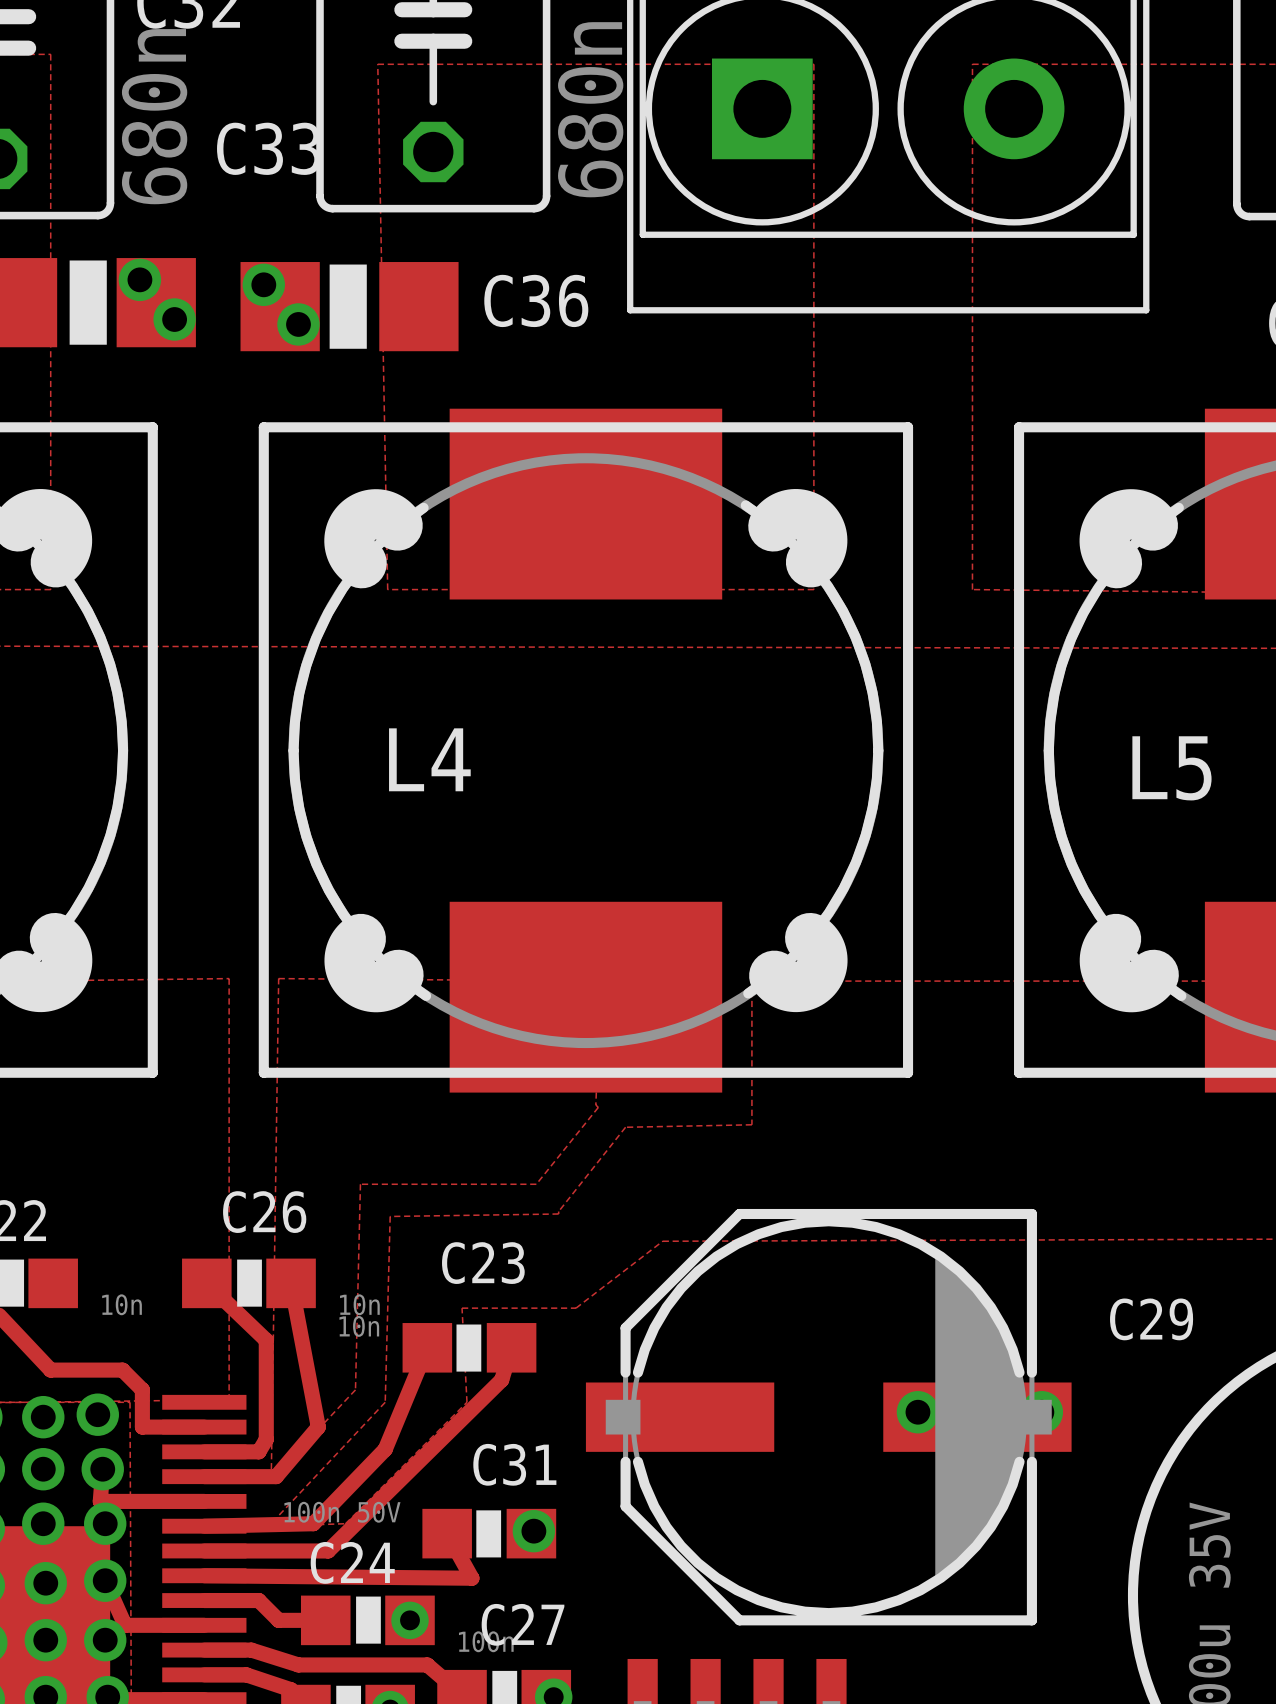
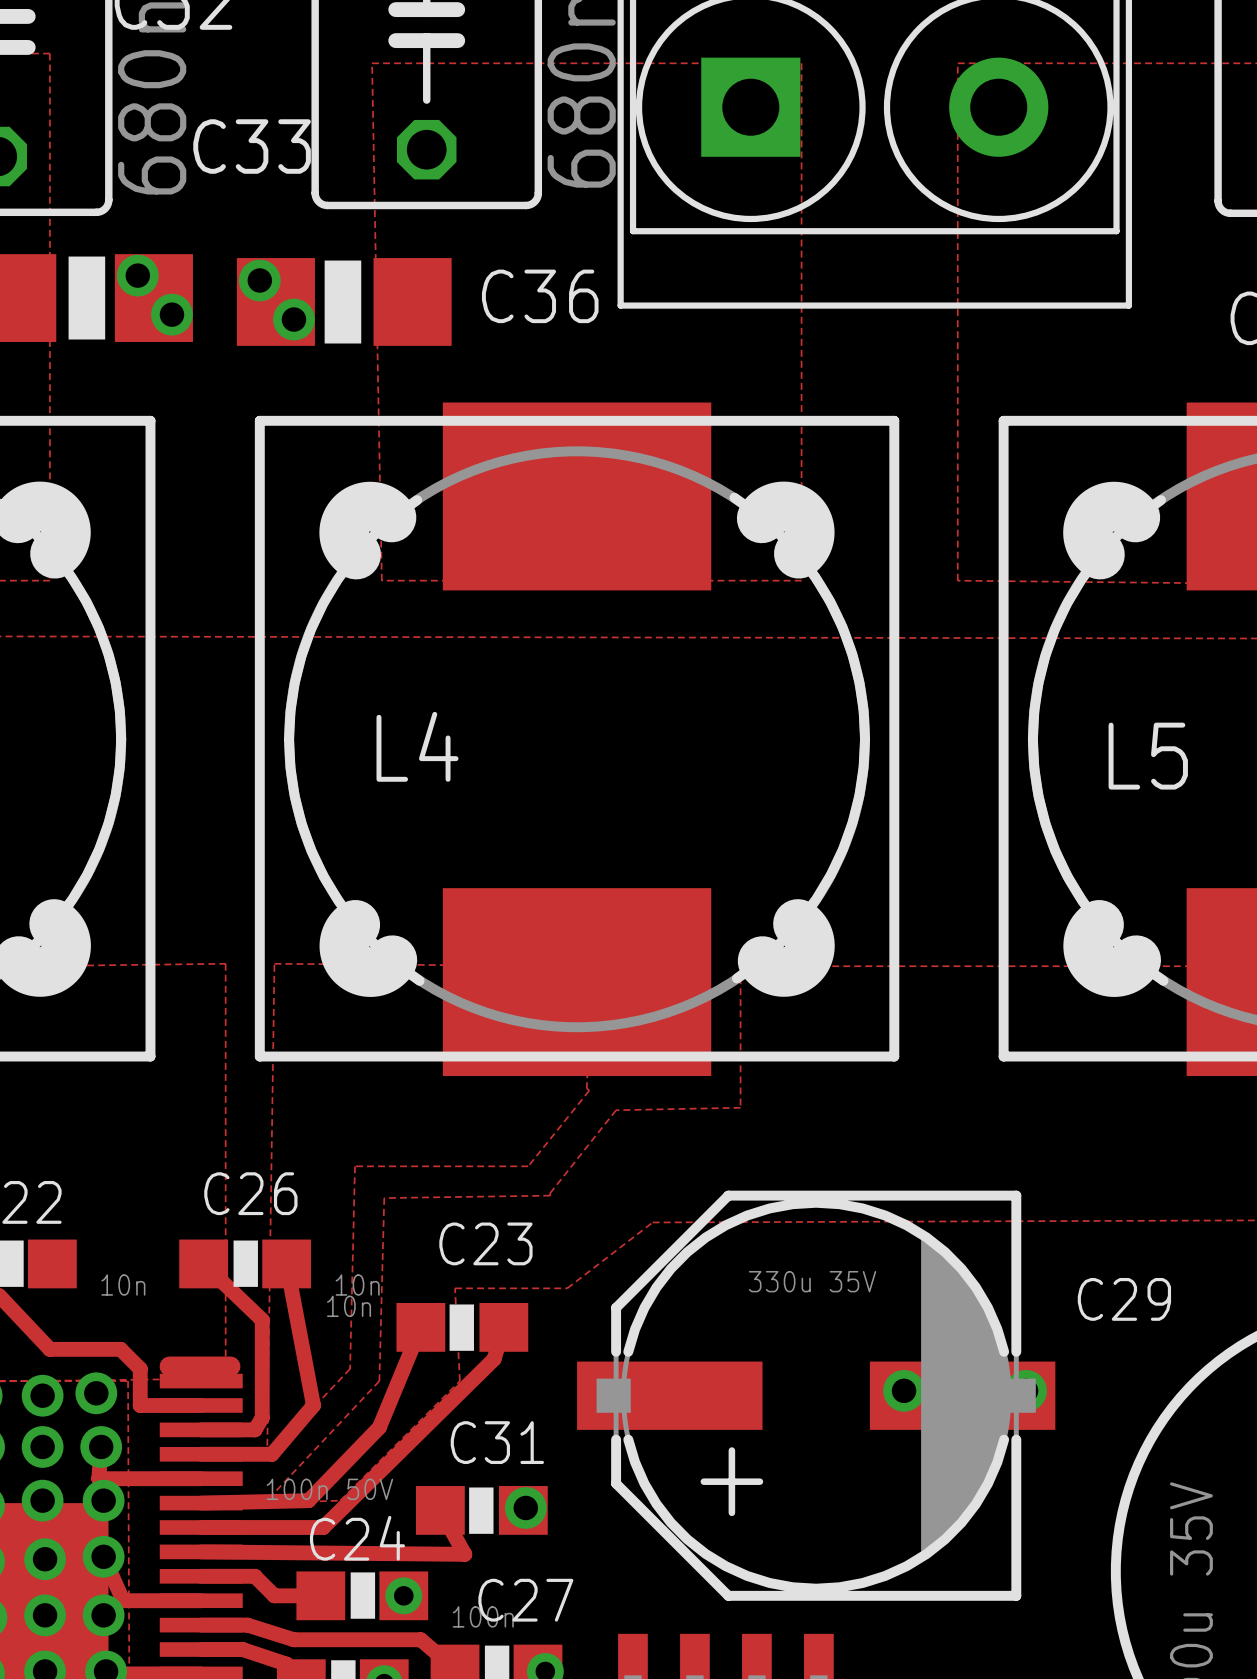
C29 value: none -> 330u 35V (812, 1281)
top track: none -> (169, 1366) (230, 1366)
text: none -> + (731, 1481)

